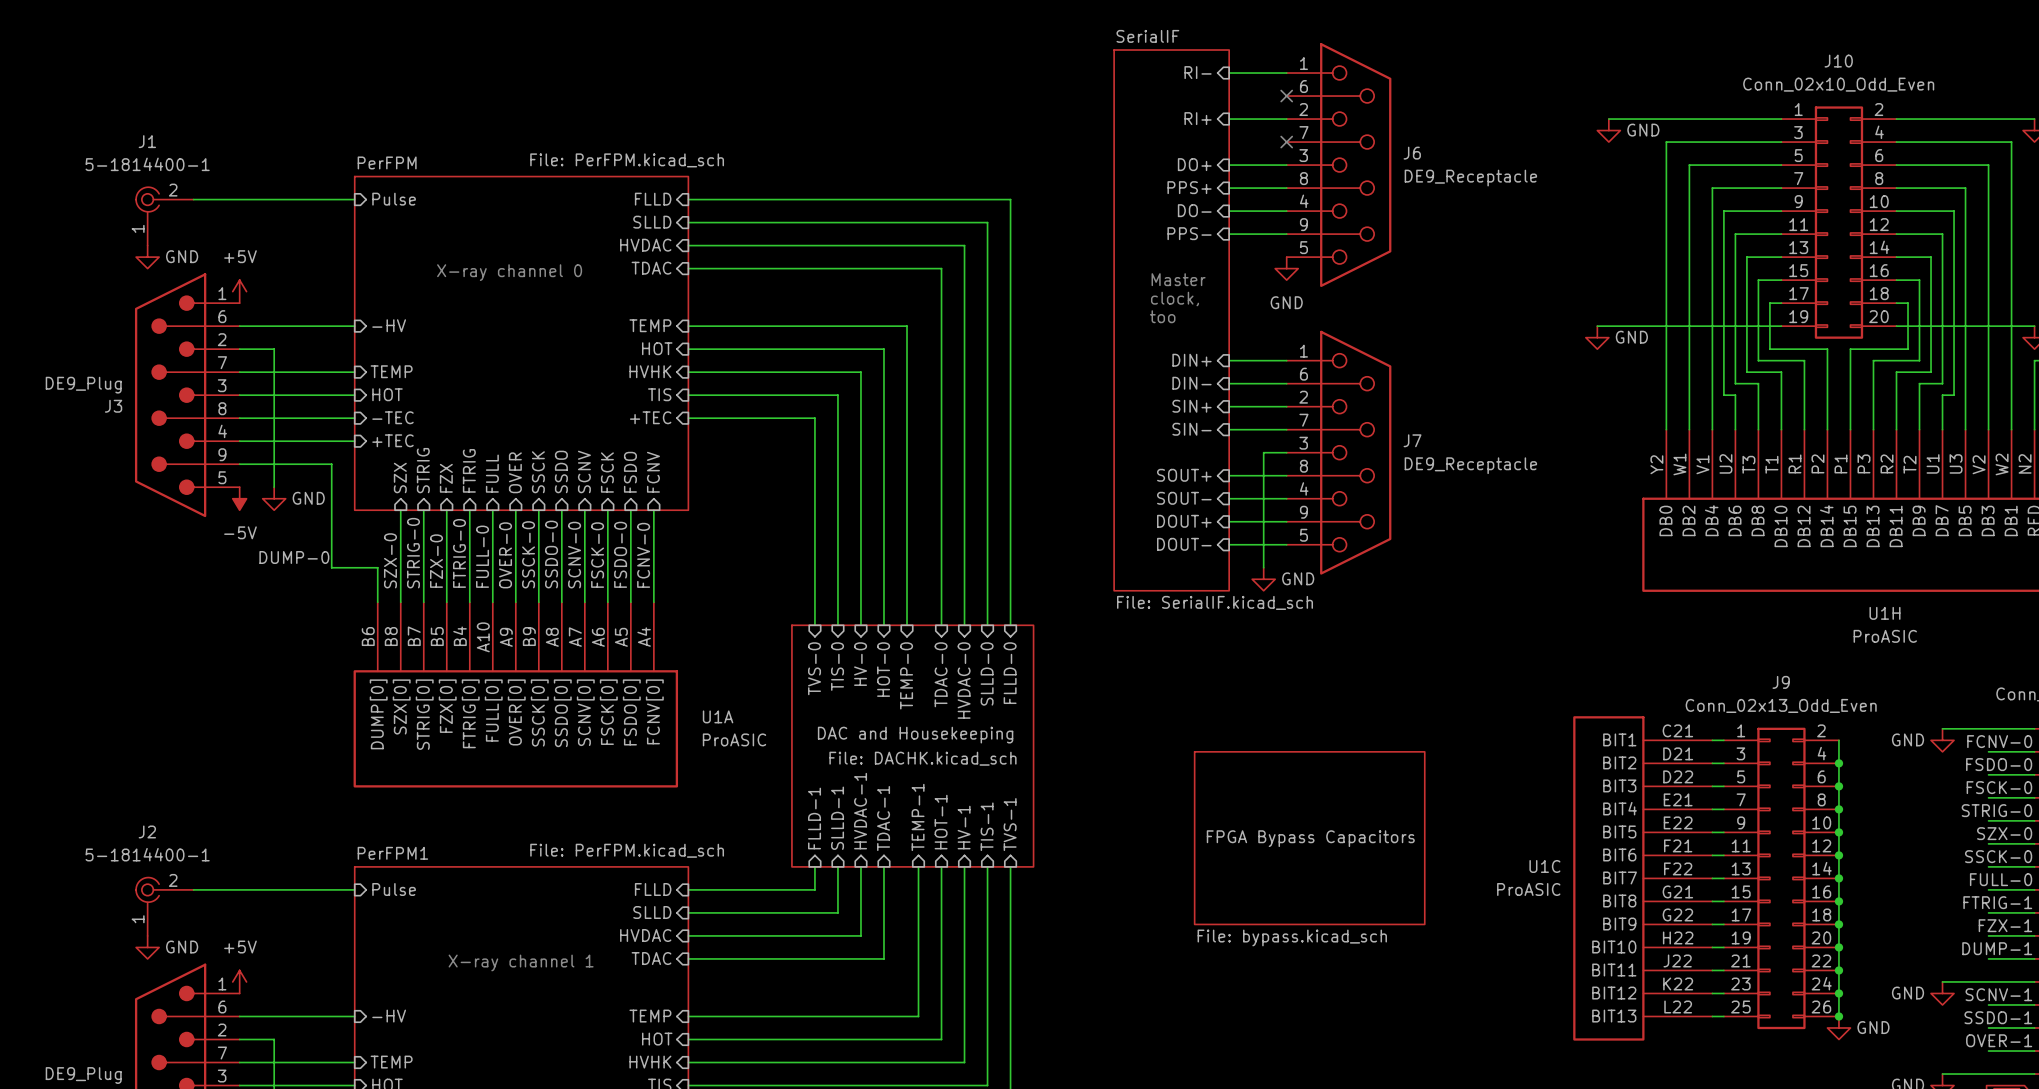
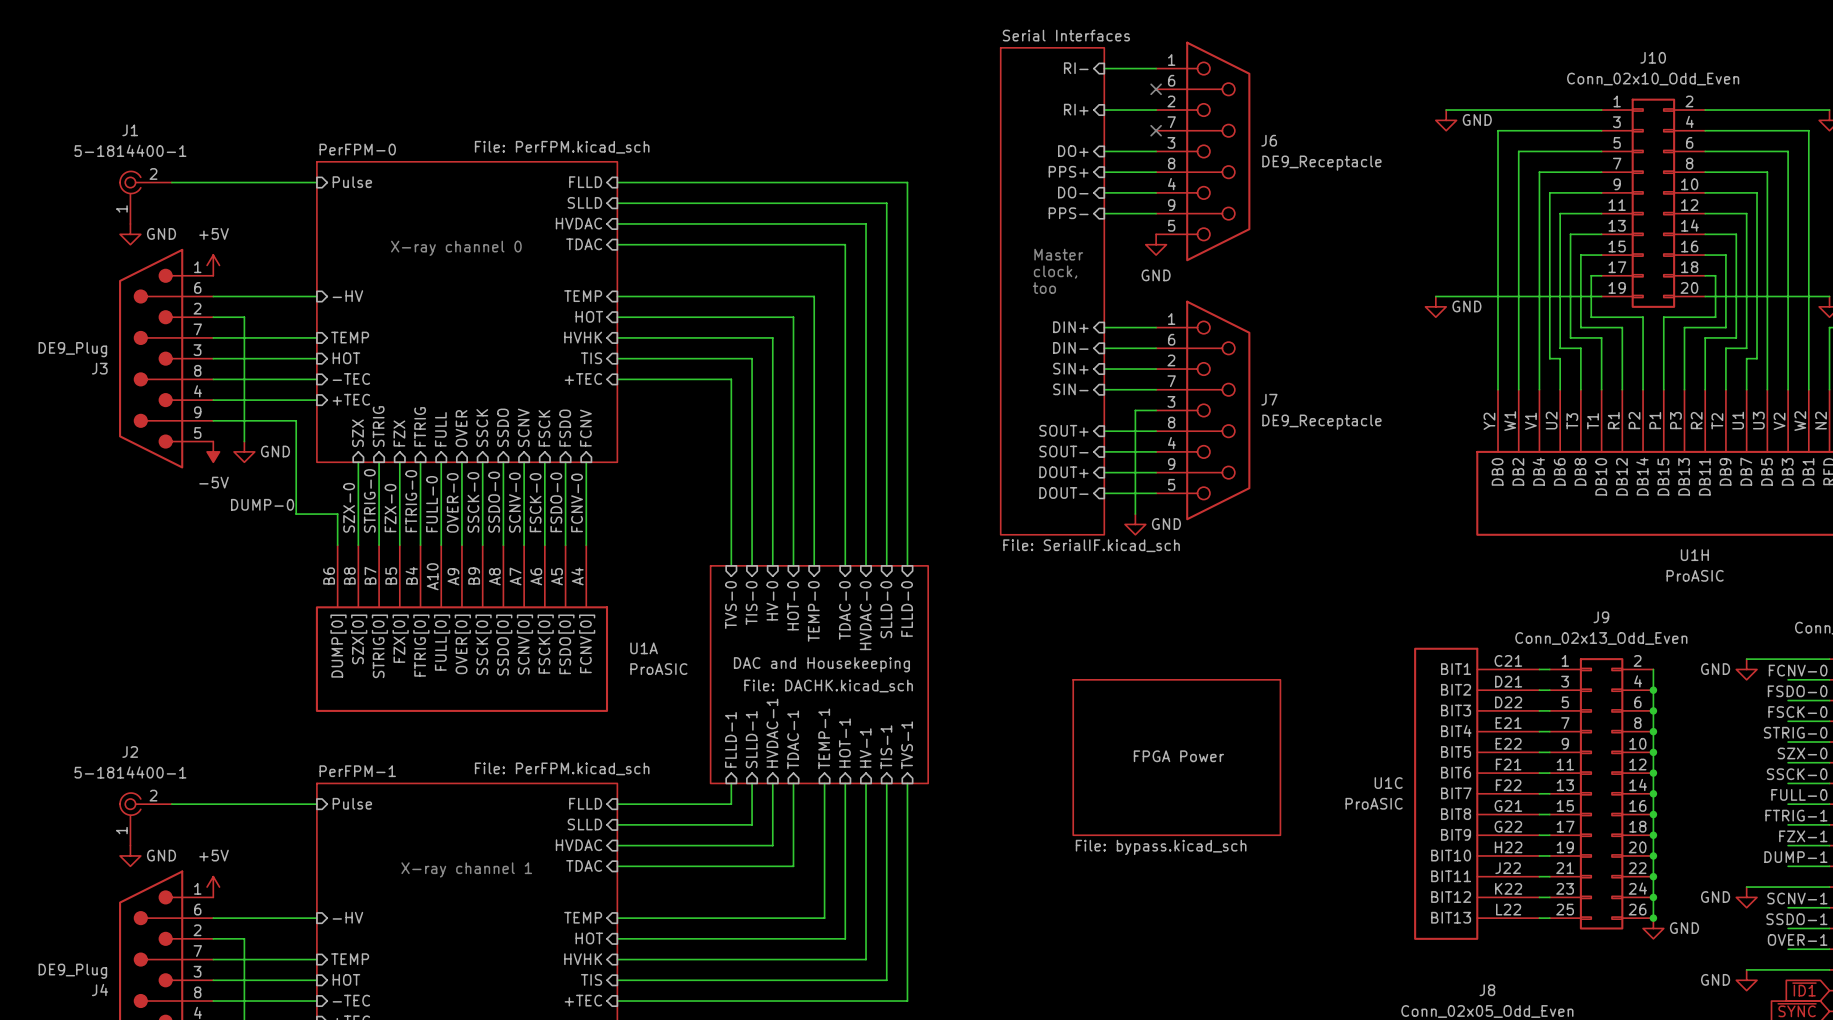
sheet SerialIF name: SerialIF (1147, 36) -> Serial Interfaces (1066, 35)
sheet PerFPM name: PerFPM (387, 162) -> PerFPM-0 (357, 149)
sheet FPGA Bypass Capacitors name: FPGA Bypass Capacitors (1310, 838) -> FPGA Power (1178, 756)
sheet PerFPM1 name: PerFPM1 (392, 853) -> PerFPM-1 (357, 771)

